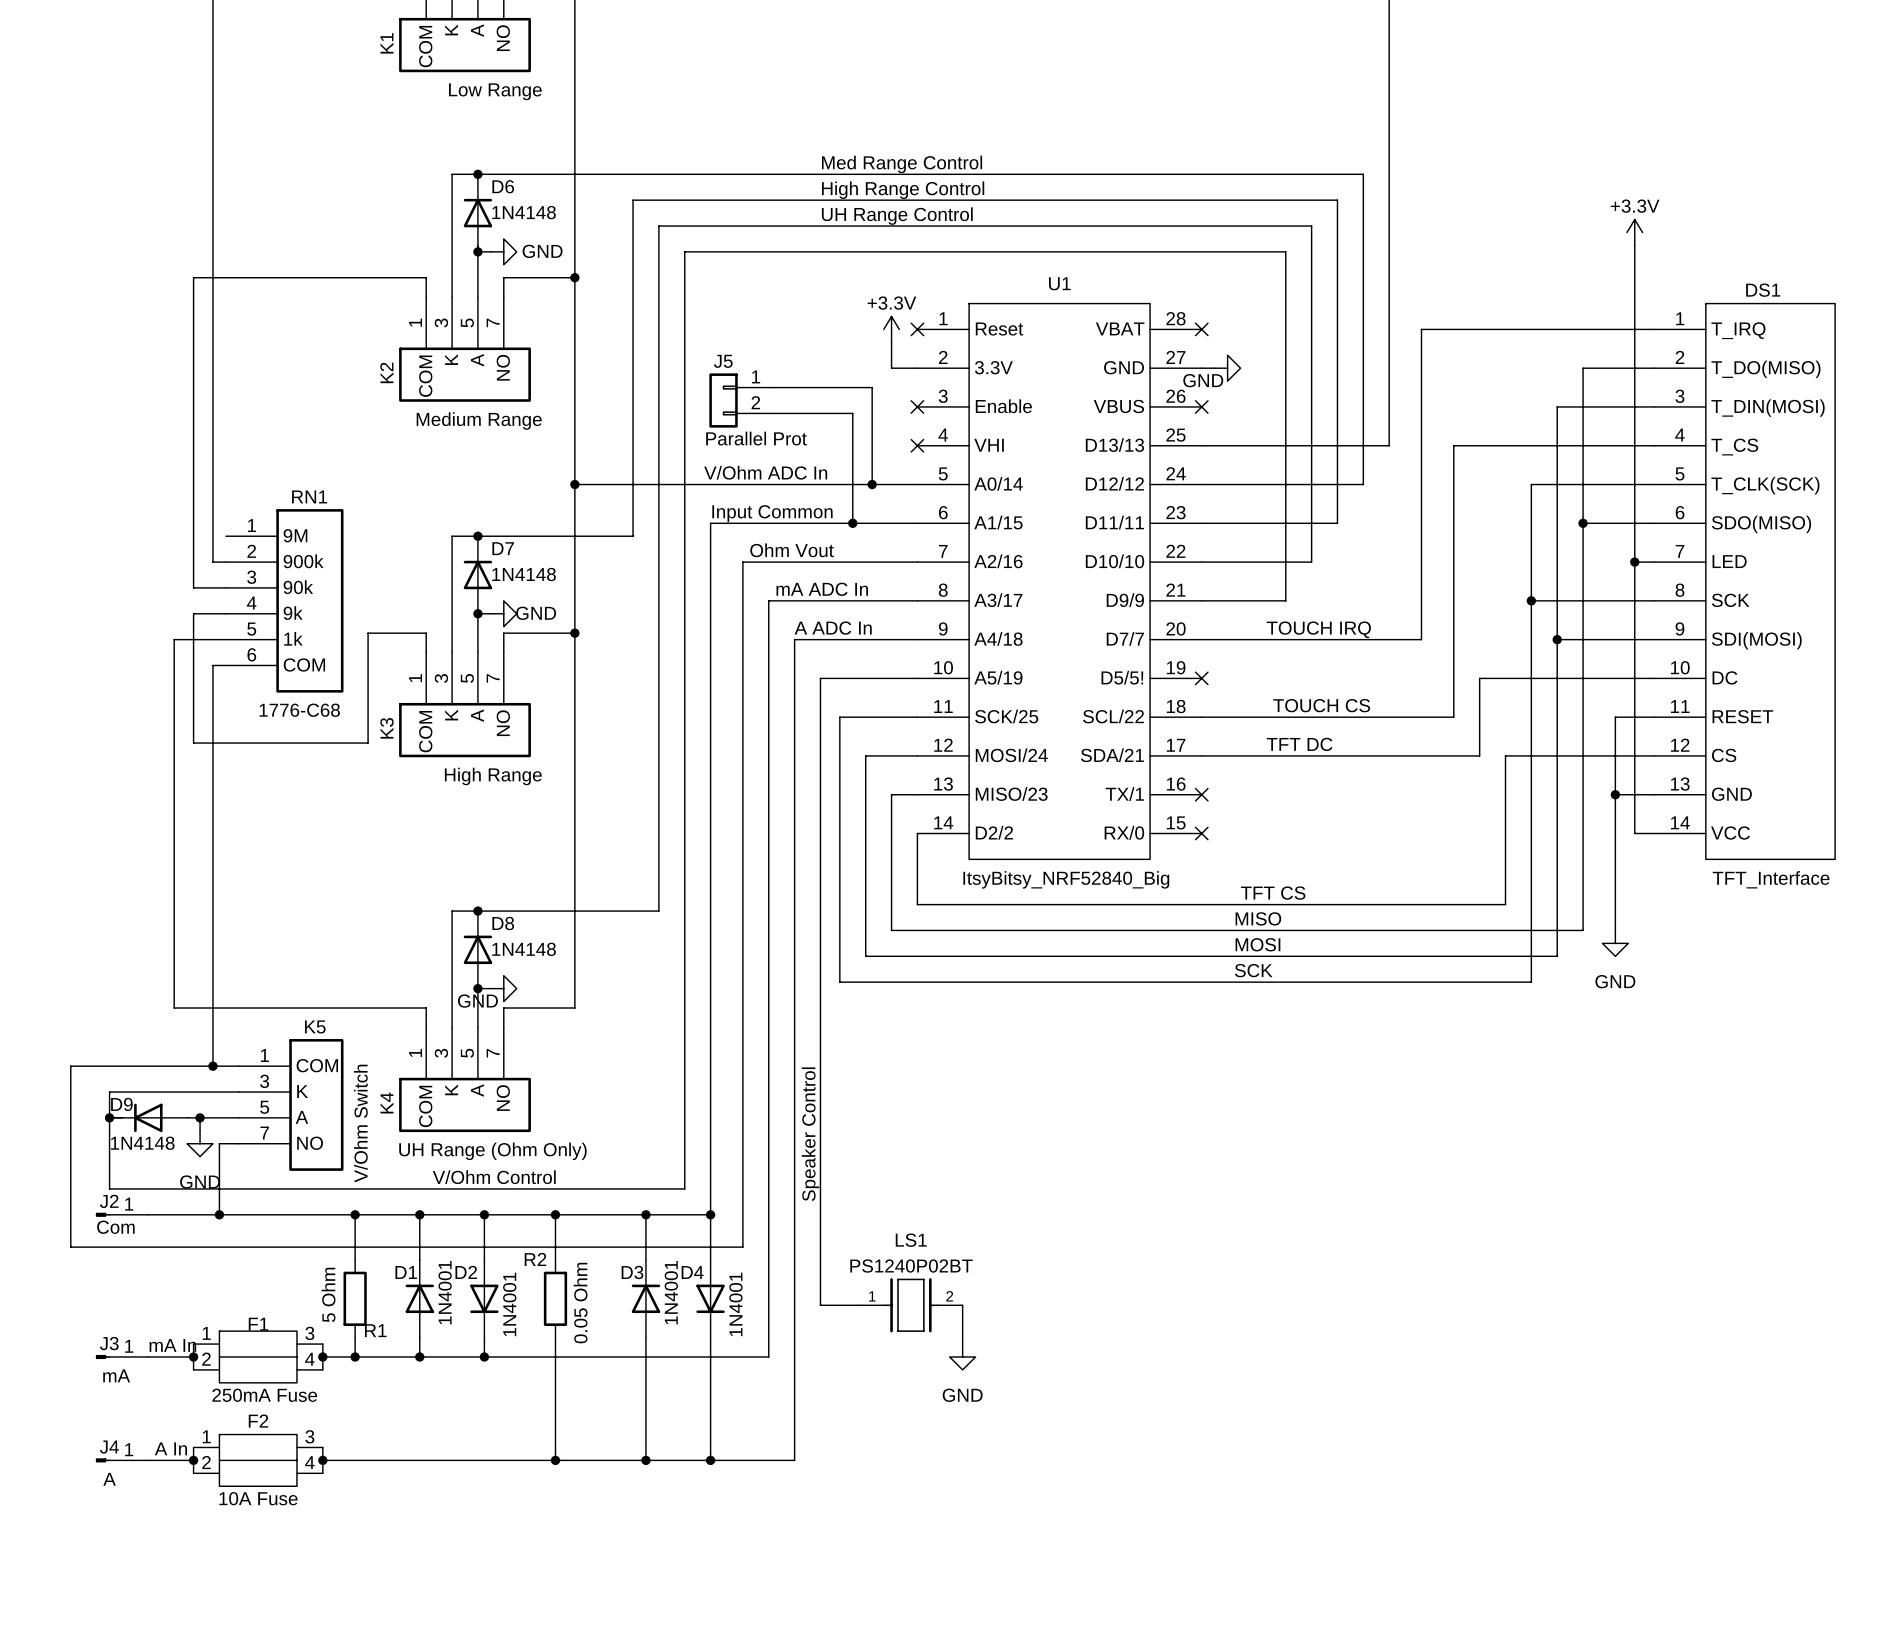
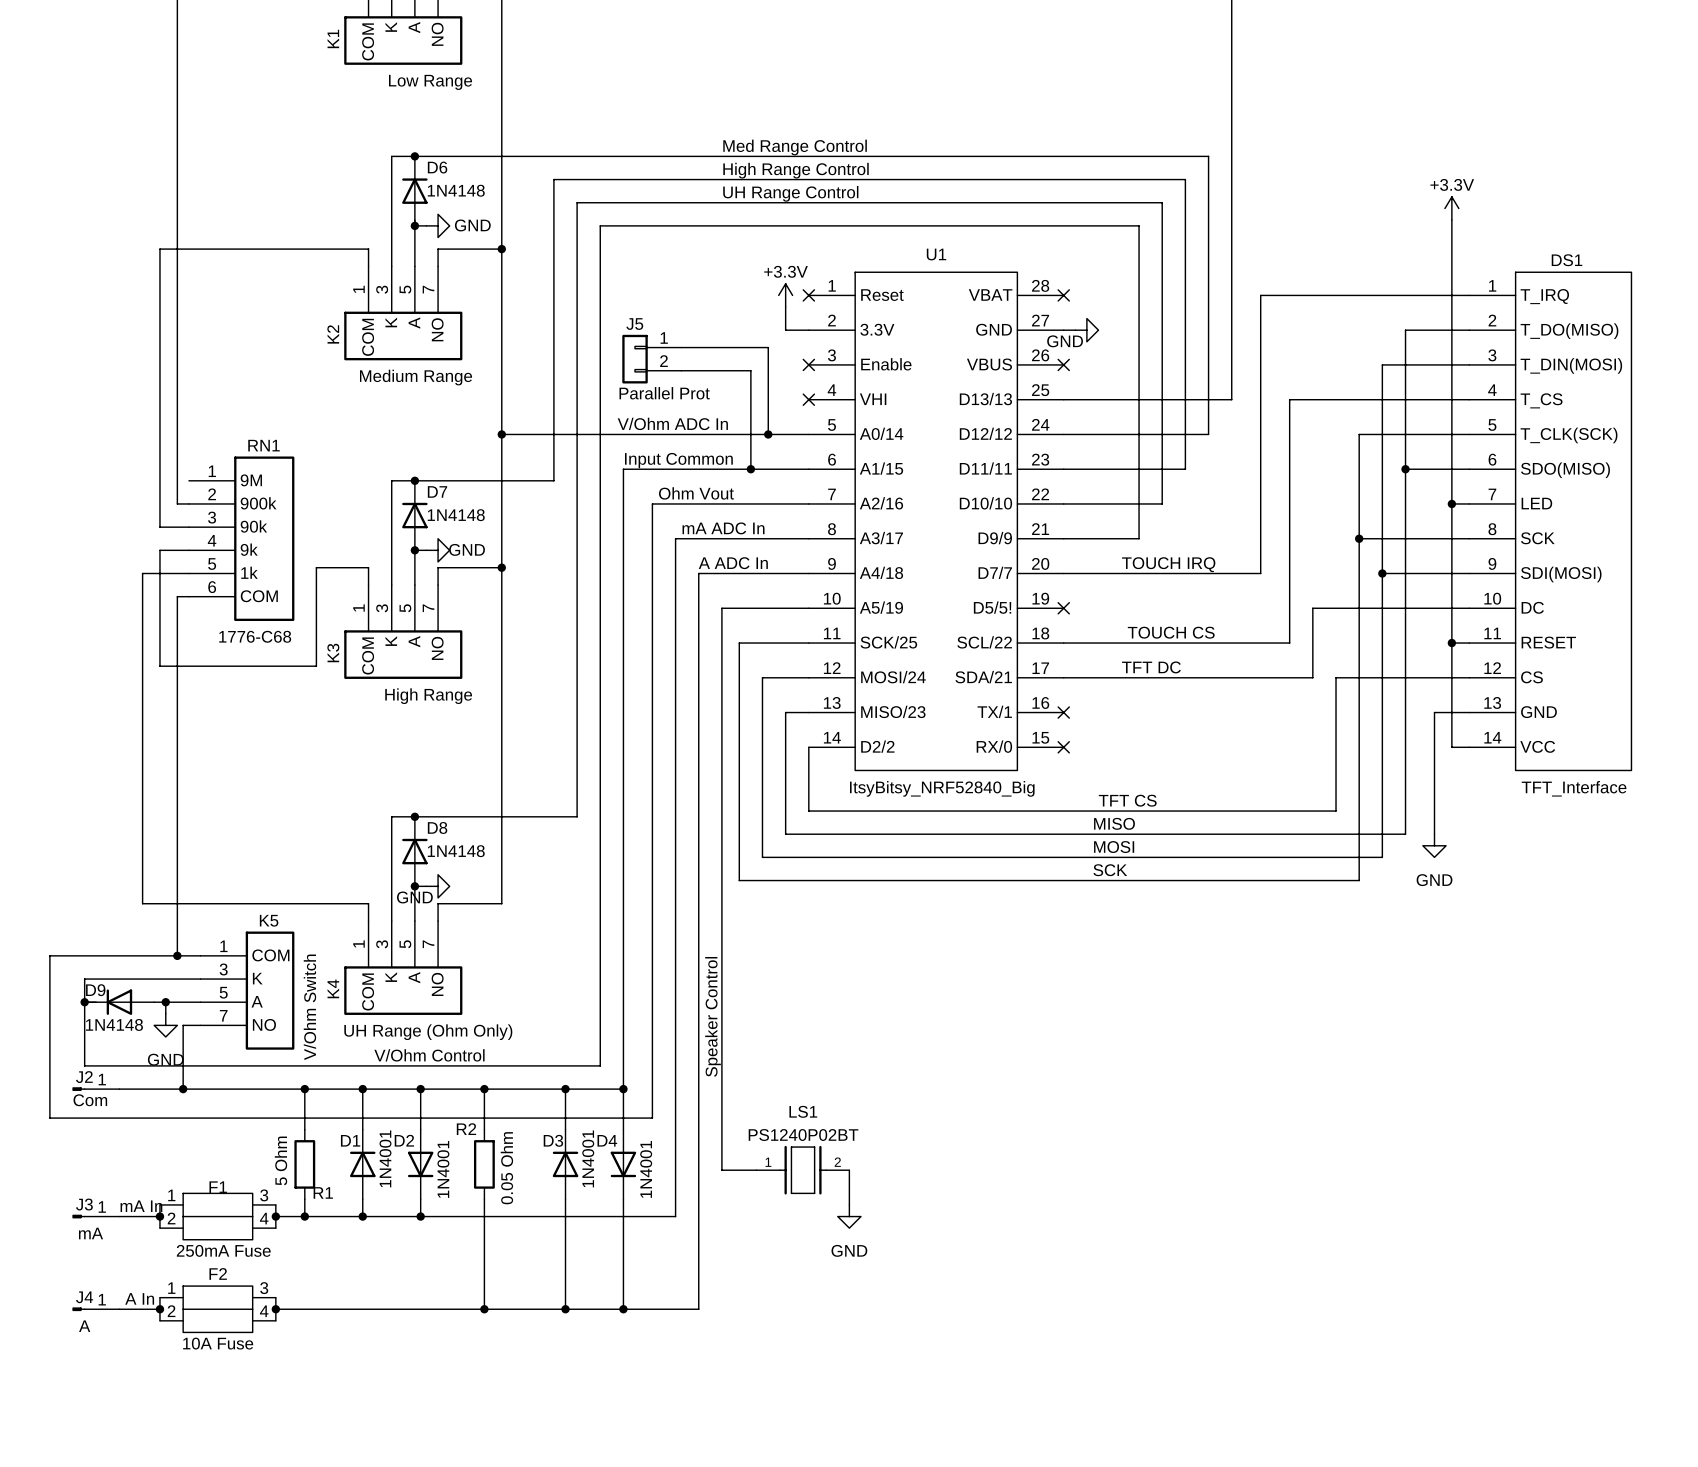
wire: (1634, 717) (1615, 717) (1615, 794) -> none
junction: none -> (1451, 643)
junction: (1615, 794) -> none

